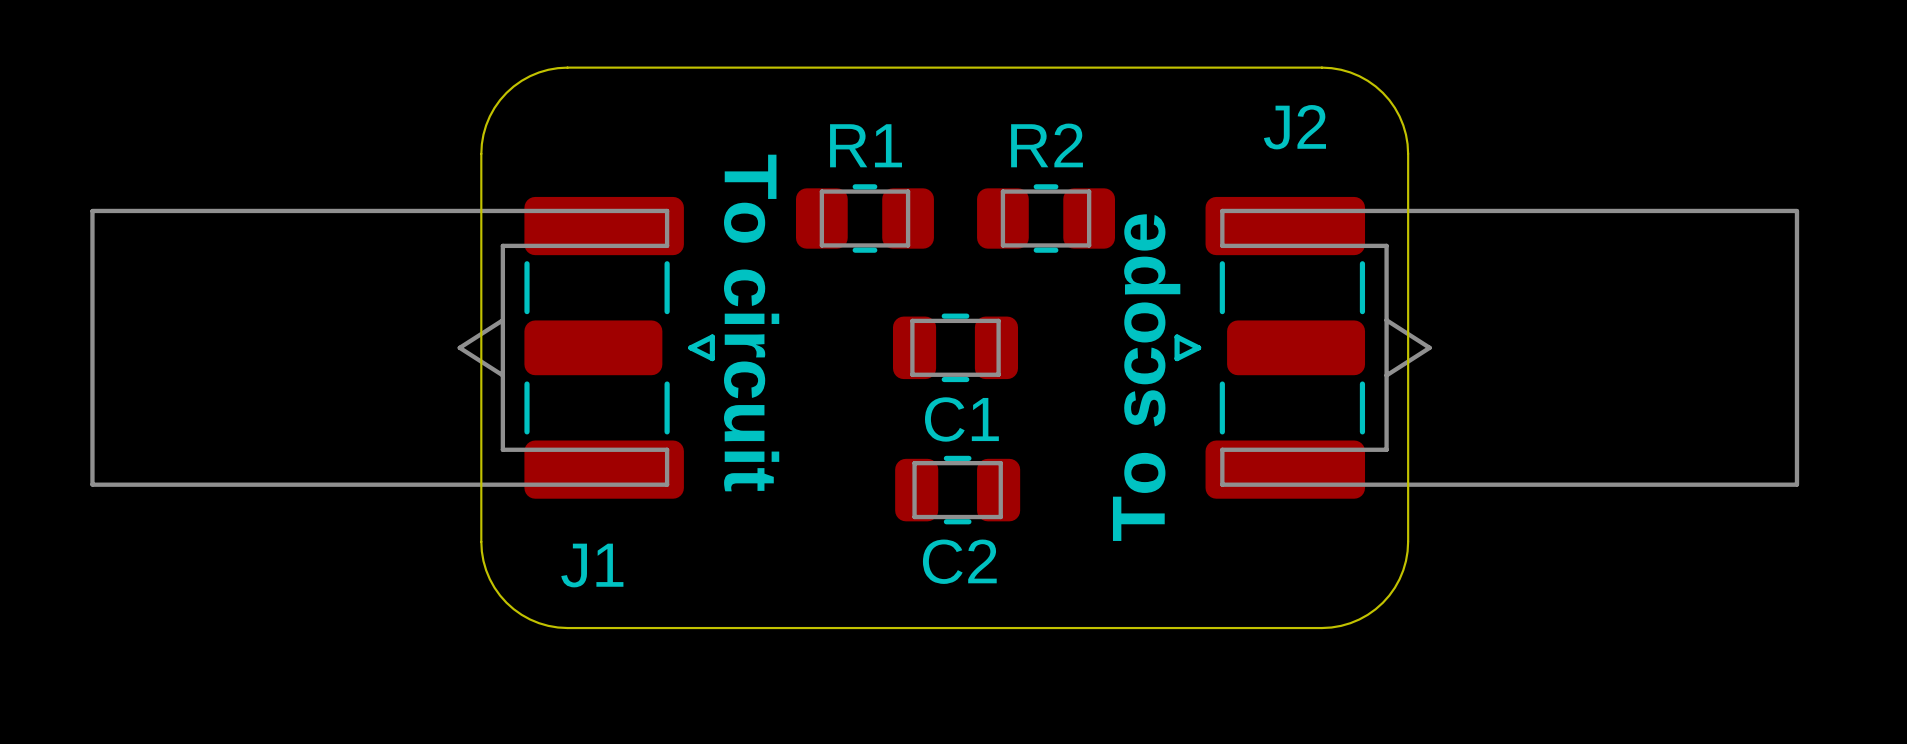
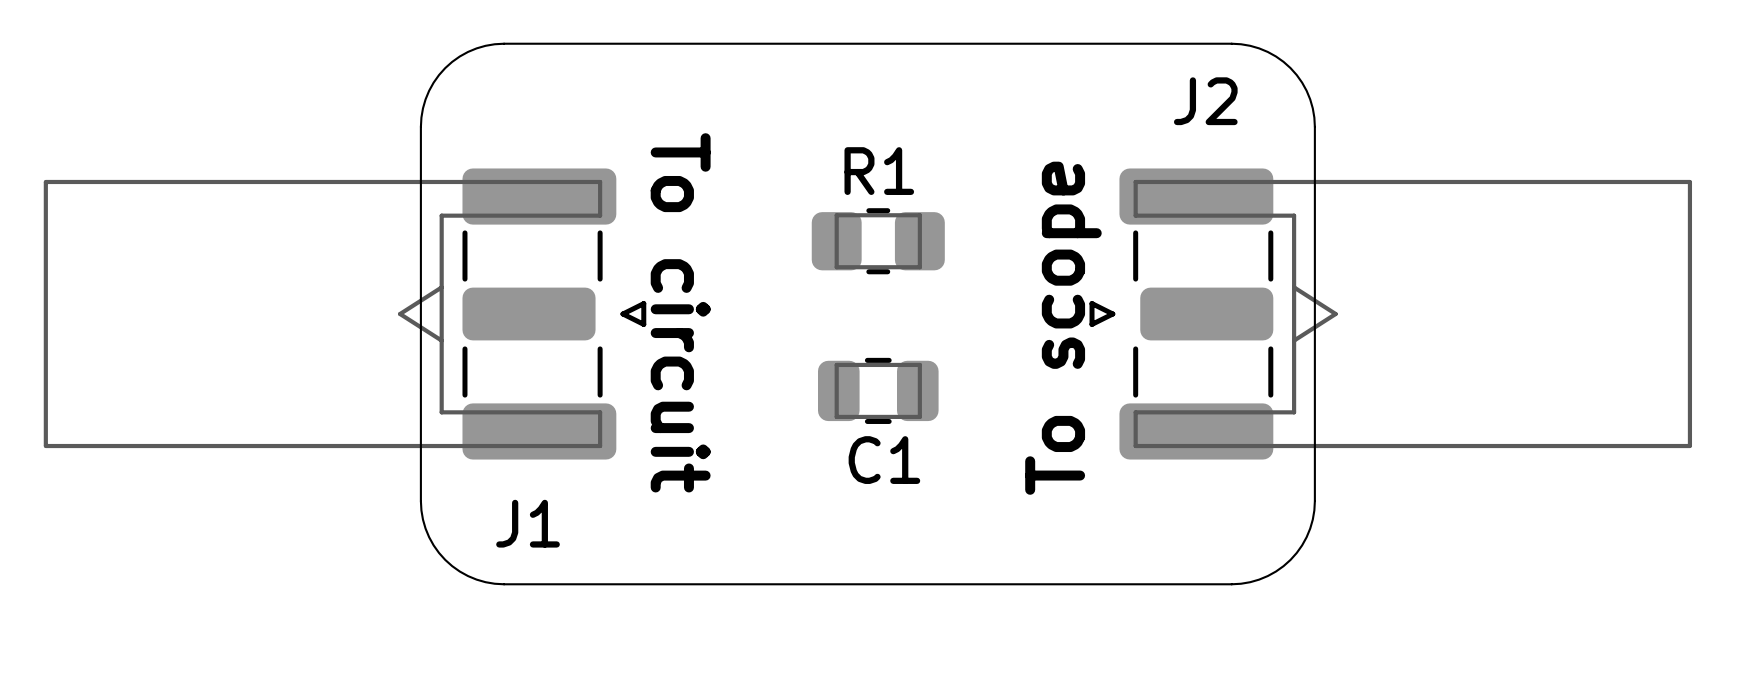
R1 position: (864, 218) -> (878, 241)
R2: (1046, 218) -> none
C1 position: (955, 347) -> (878, 390)
C2: (957, 490) -> none

